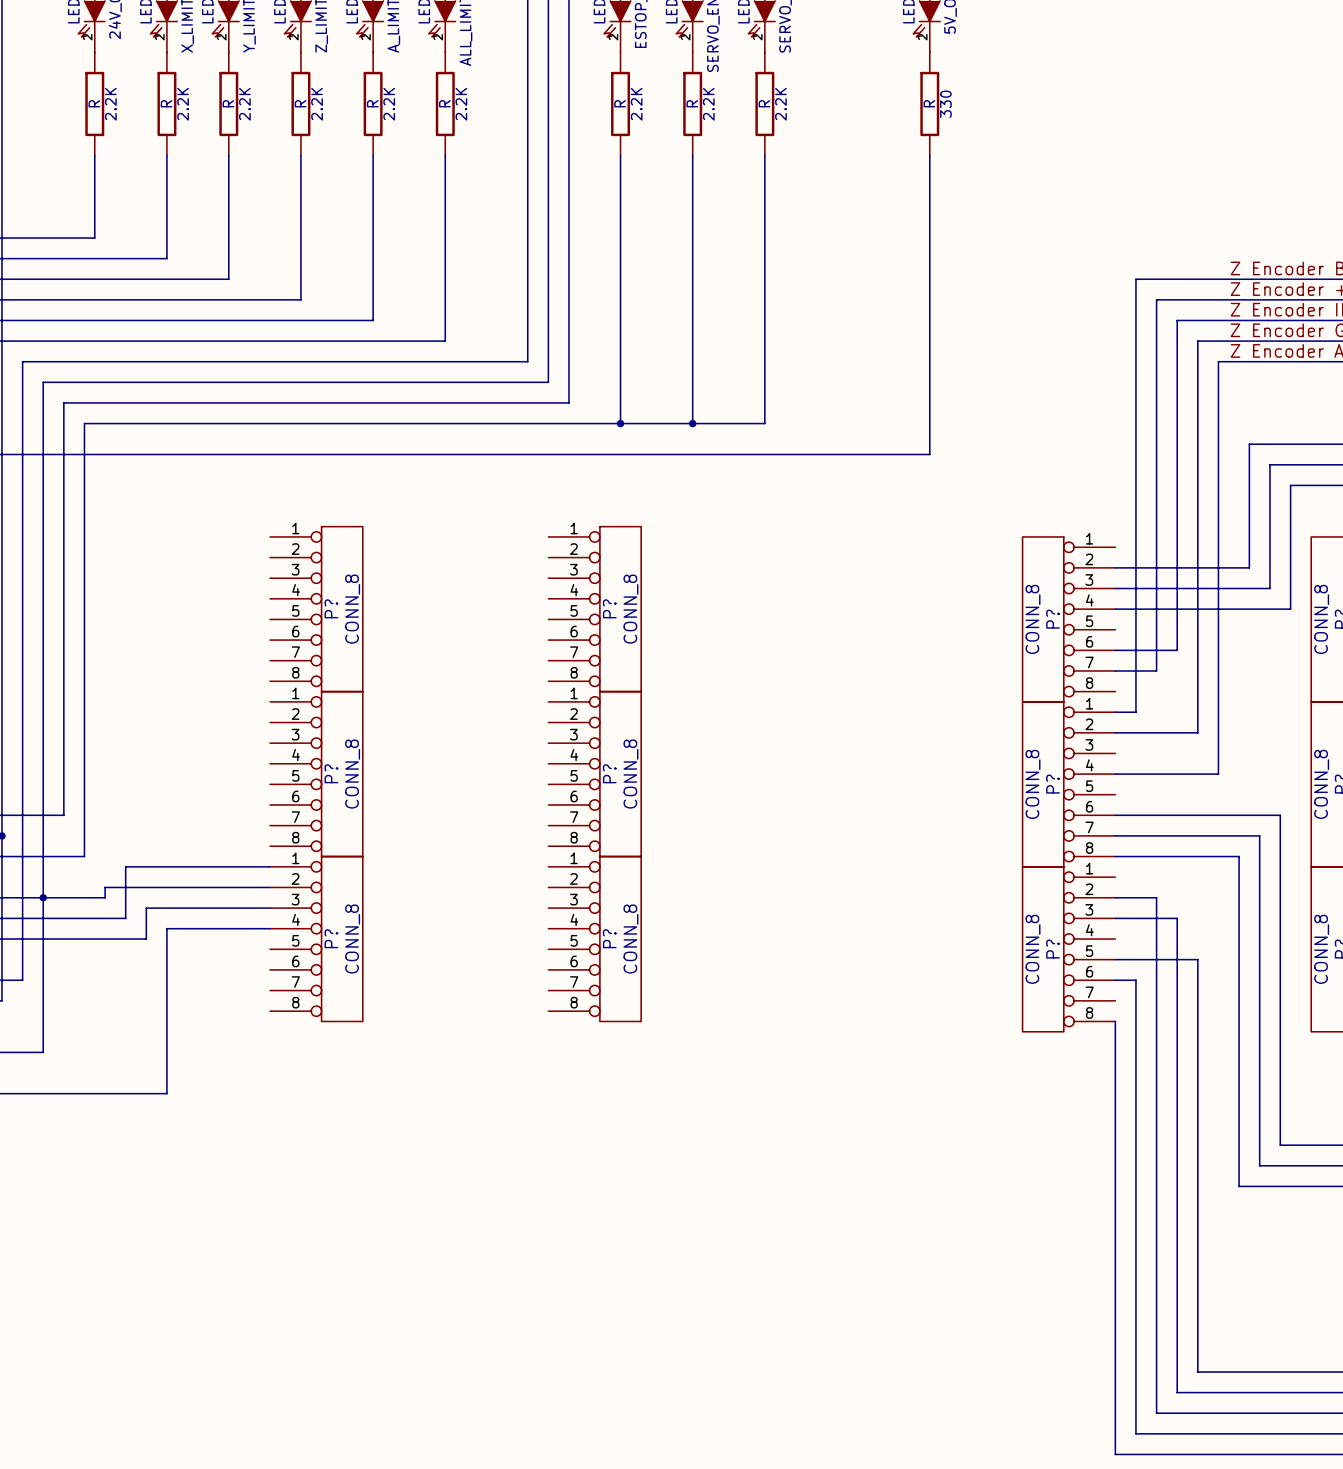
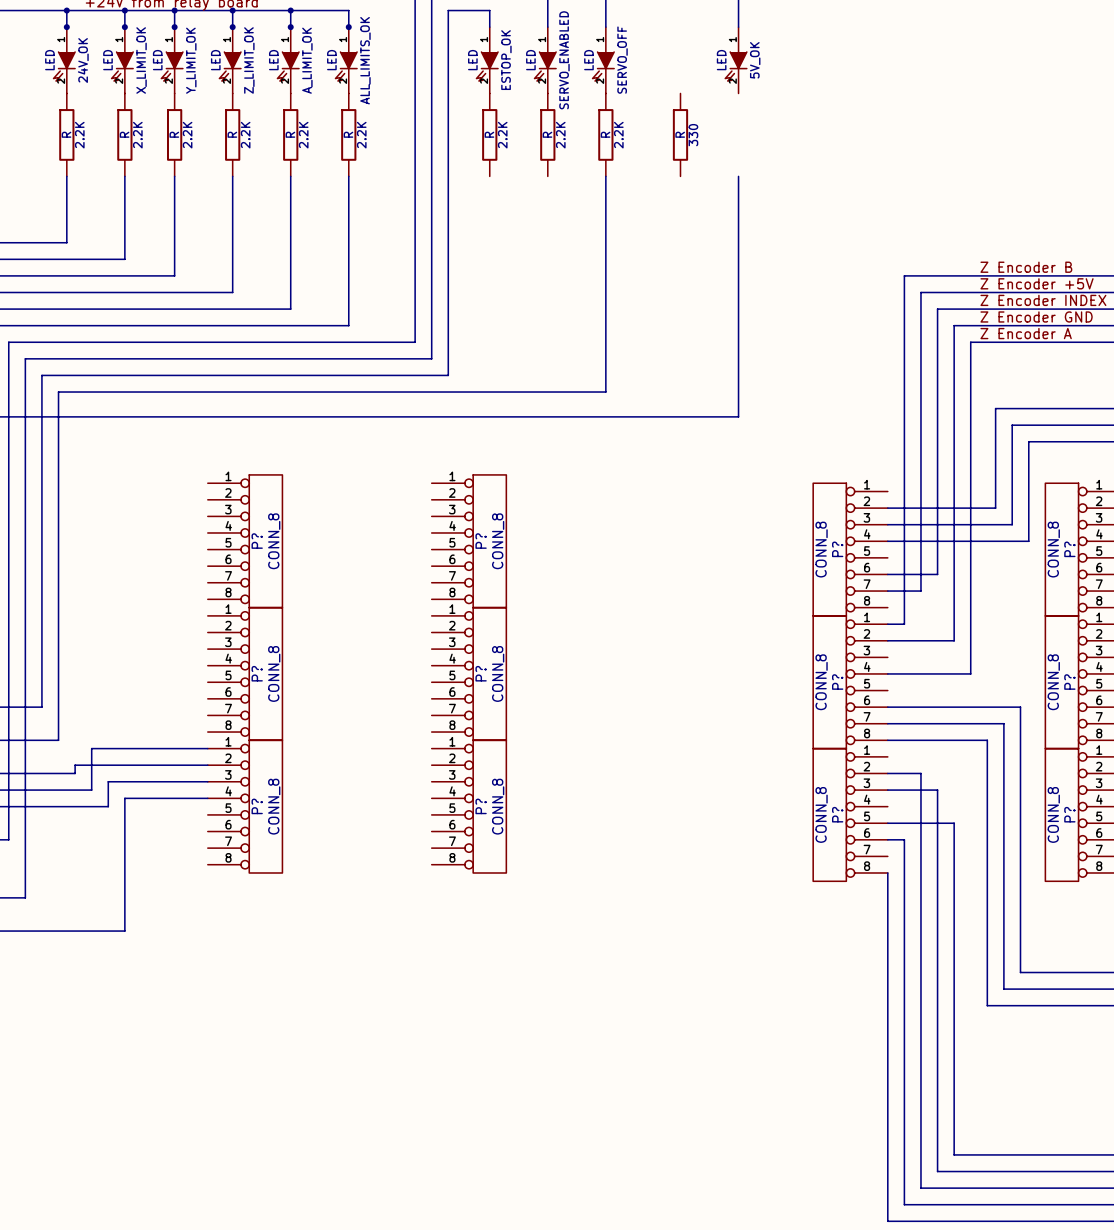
330 position: (929, 103) -> (680, 134)
wire: (620, 155) (620, 423) -> none
wire: (692, 155) (692, 423) -> none
junction: (620, 423) -> none
junction: (692, 423) -> none
junction: (43, 897) -> none

